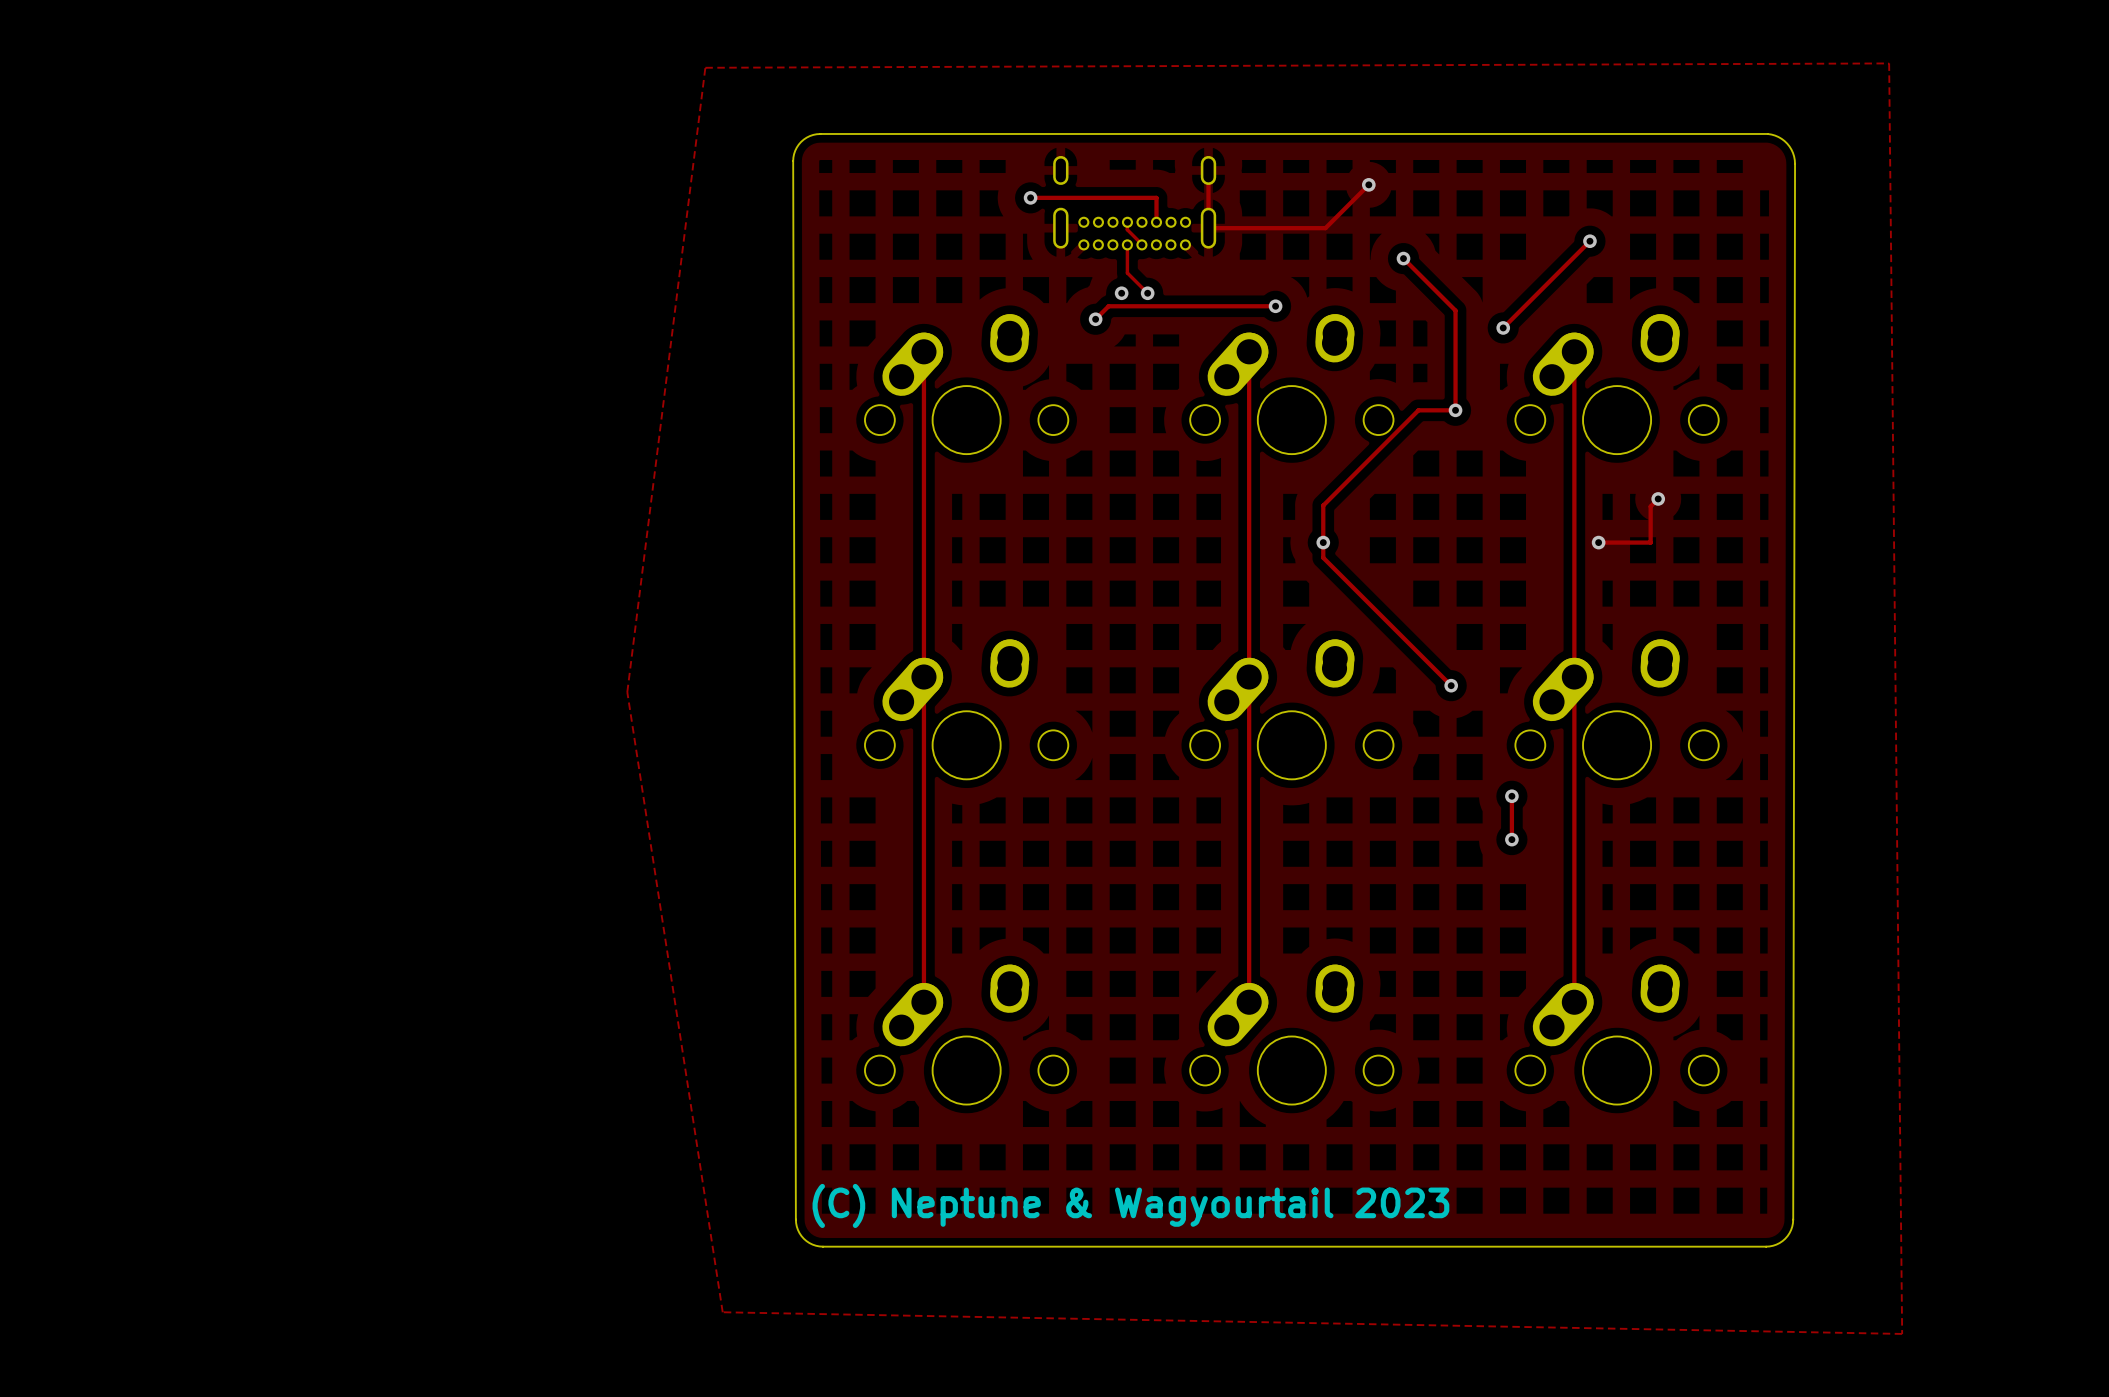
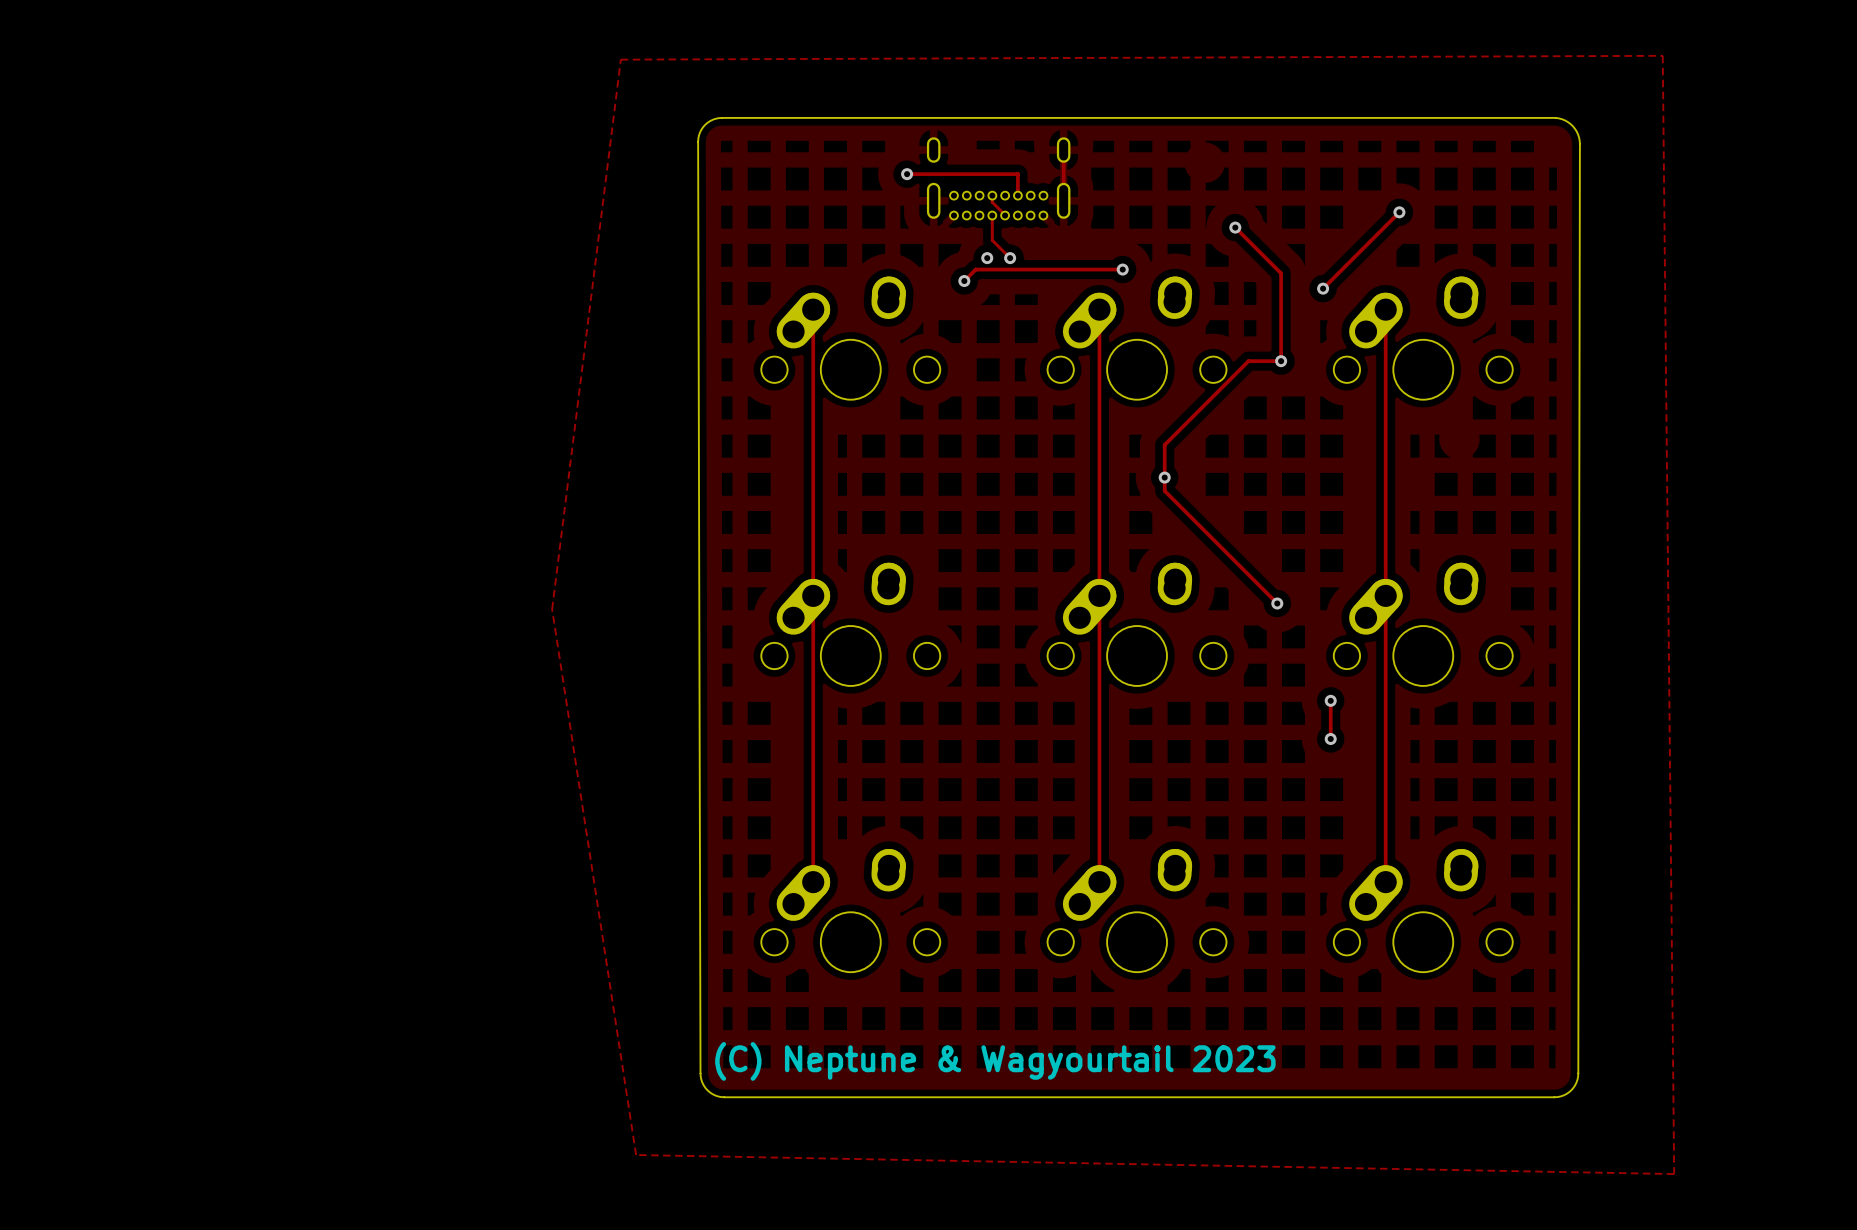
track: (1368, 184) (1325, 228) (1208, 228) -> none
via: (1368, 184) -> none
track: (1658, 498) (1650, 506) (1650, 542) (1598, 542) -> none
via: (1658, 498) -> none
via: (1598, 542) -> none

